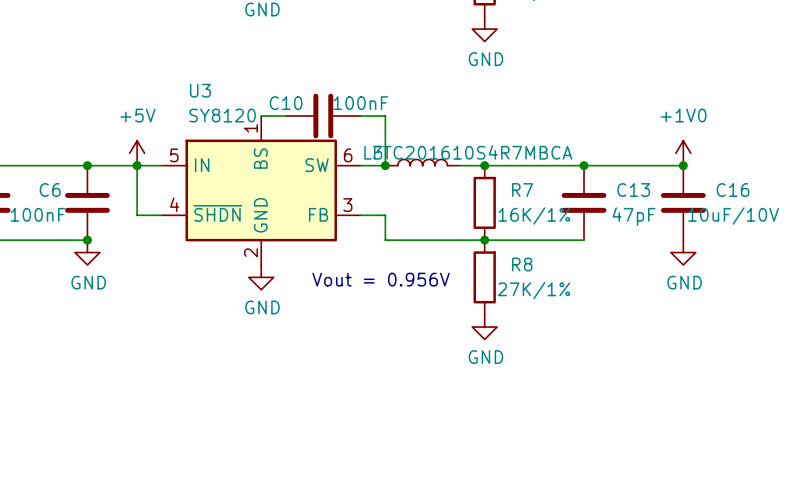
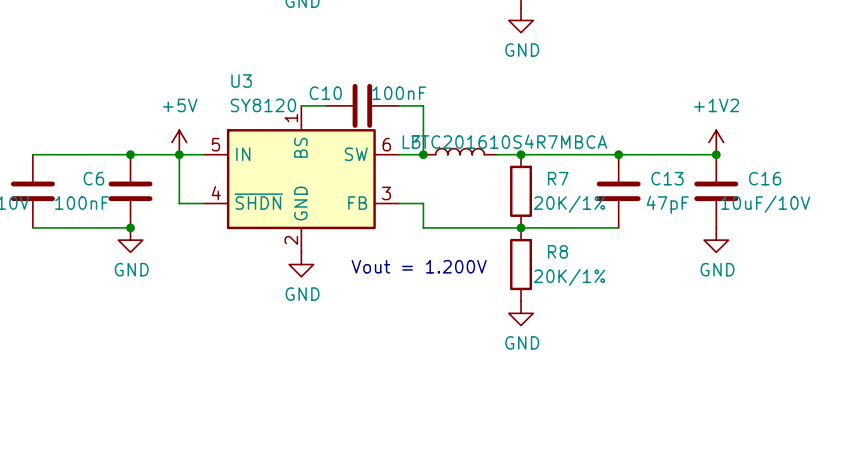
power symbol: +1V0 (683, 153) -> +1V2 (716, 142)
R7 value: 16K/1% (534, 216) -> 20K/1% (569, 204)
text: Vout = 0.956V (381, 279) -> Vout = 1.200V (419, 266)
R8 value: 27K/1% (534, 290) -> 20K/1% (569, 277)

